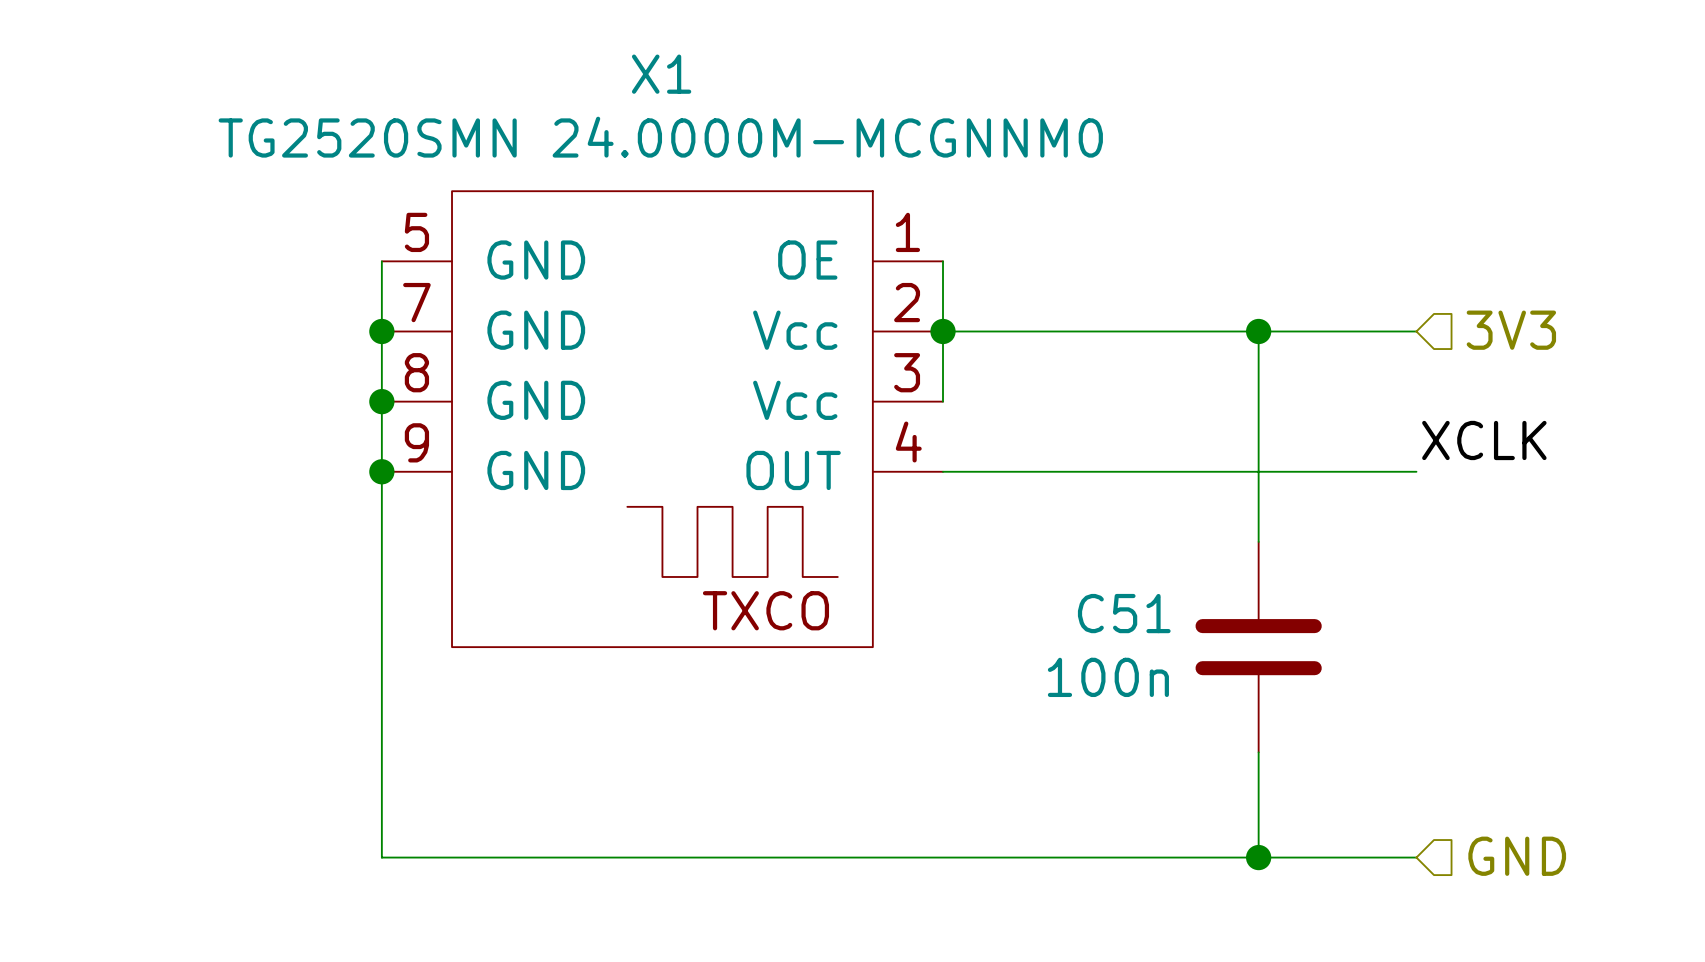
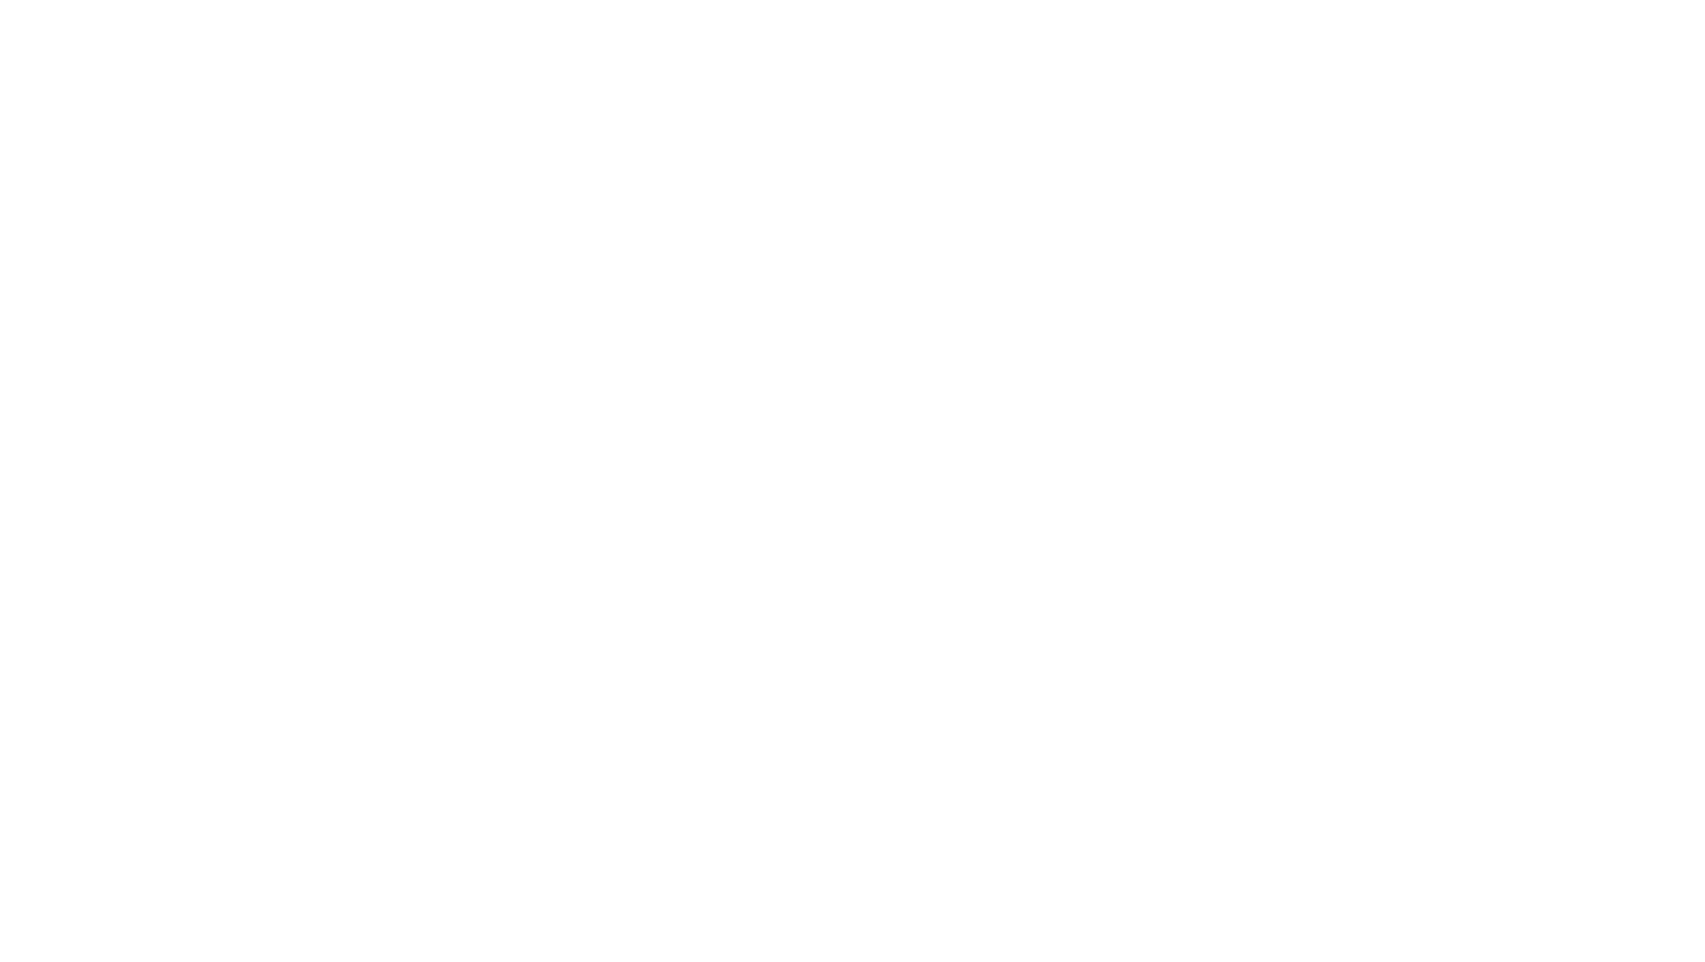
wire: (381, 261) (381, 857) (1416, 857) -> none
wire: (943, 261) (943, 401) -> none
hierarchical label: 3V3 (1511, 330) -> none
junction: (381, 331) -> none
wire: (943, 331) (1416, 331) -> none
junction: (943, 331) -> none
wire: (1258, 331) (1258, 541) -> none
junction: (1258, 331) -> none
junction: (381, 401) -> none
X1: TG2520SMN 24.0000M-MCGNNM0 (662, 419) -> none
label: XCLK (1484, 440) -> none
junction: (381, 471) -> none
wire: (943, 471) (1416, 471) -> none
C51: 100n (1258, 647) -> none
wire: (1258, 752) (1258, 857) -> none
hierarchical label: GND (1517, 856) -> none
junction: (1258, 857) -> none

